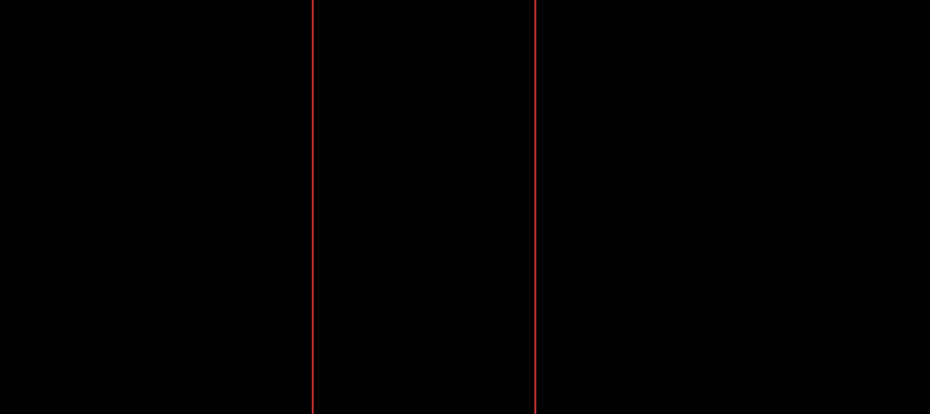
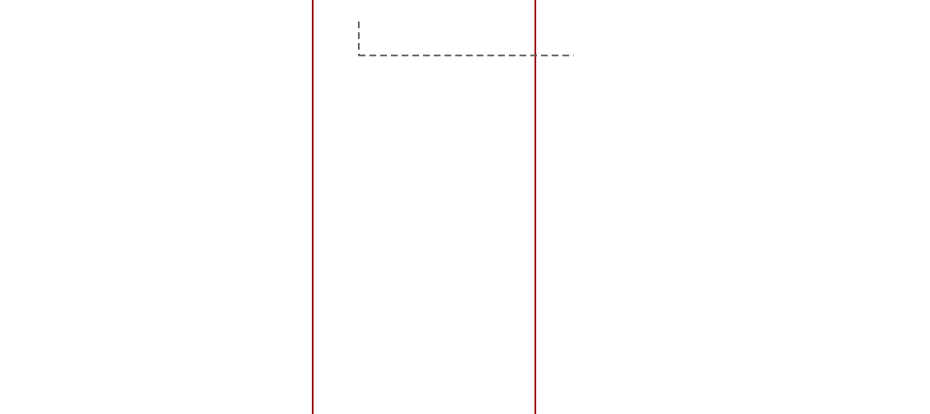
line: none -> (358, 21) (358, 55) (573, 55)

